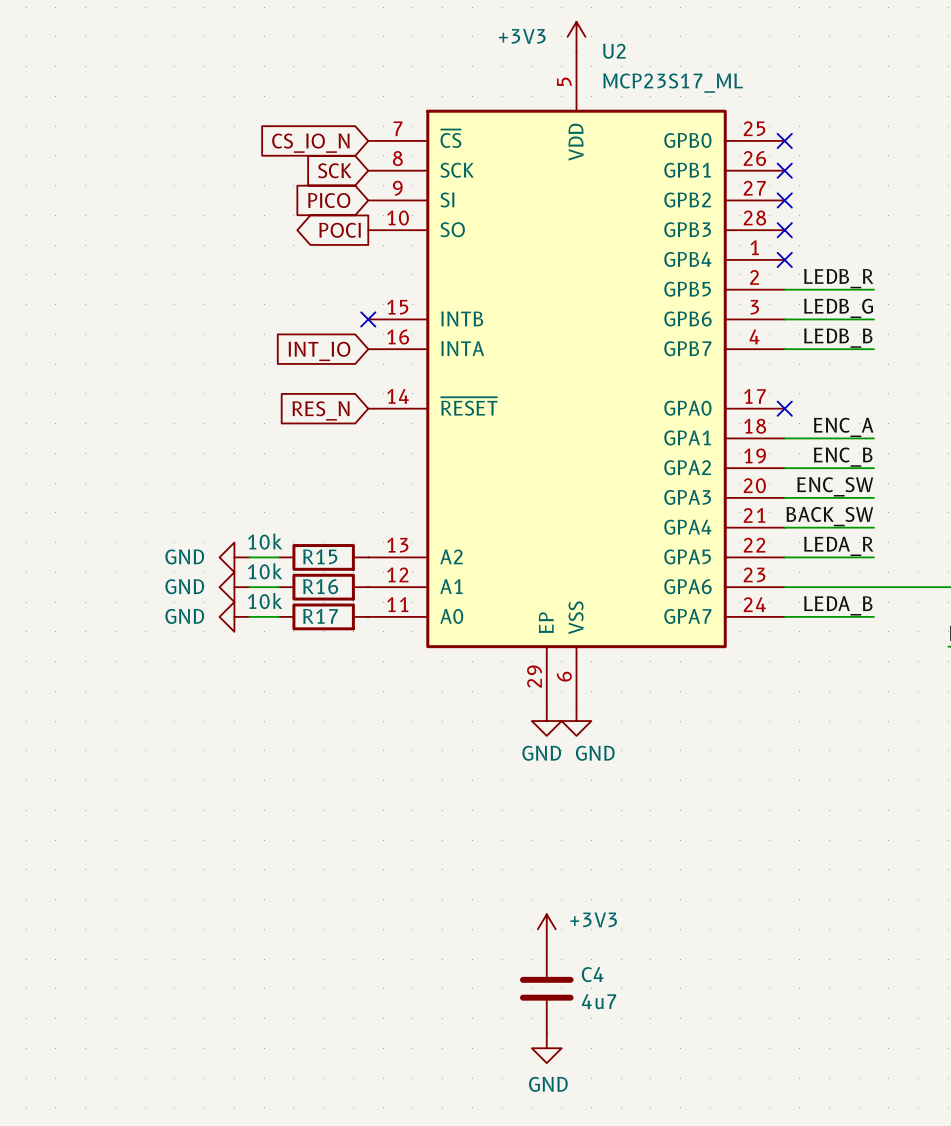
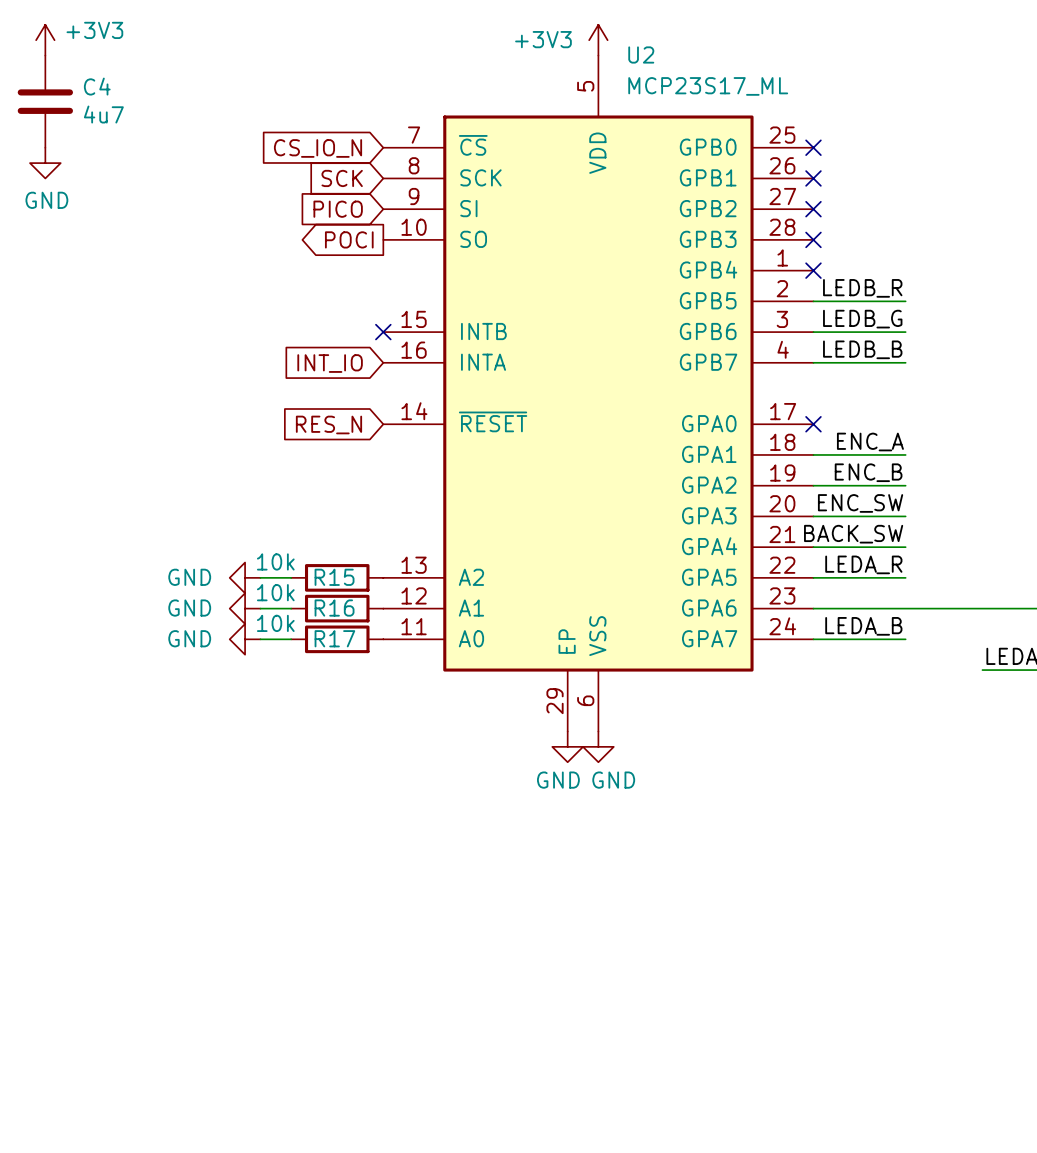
power symbol: none -> +3V3 (45, 40)
power symbol: none -> GND (45, 163)
power symbol: +3V3 (546, 929) -> none
C4 position: (546, 988) -> (45, 101)
power symbol: GND (546, 1048) -> none

